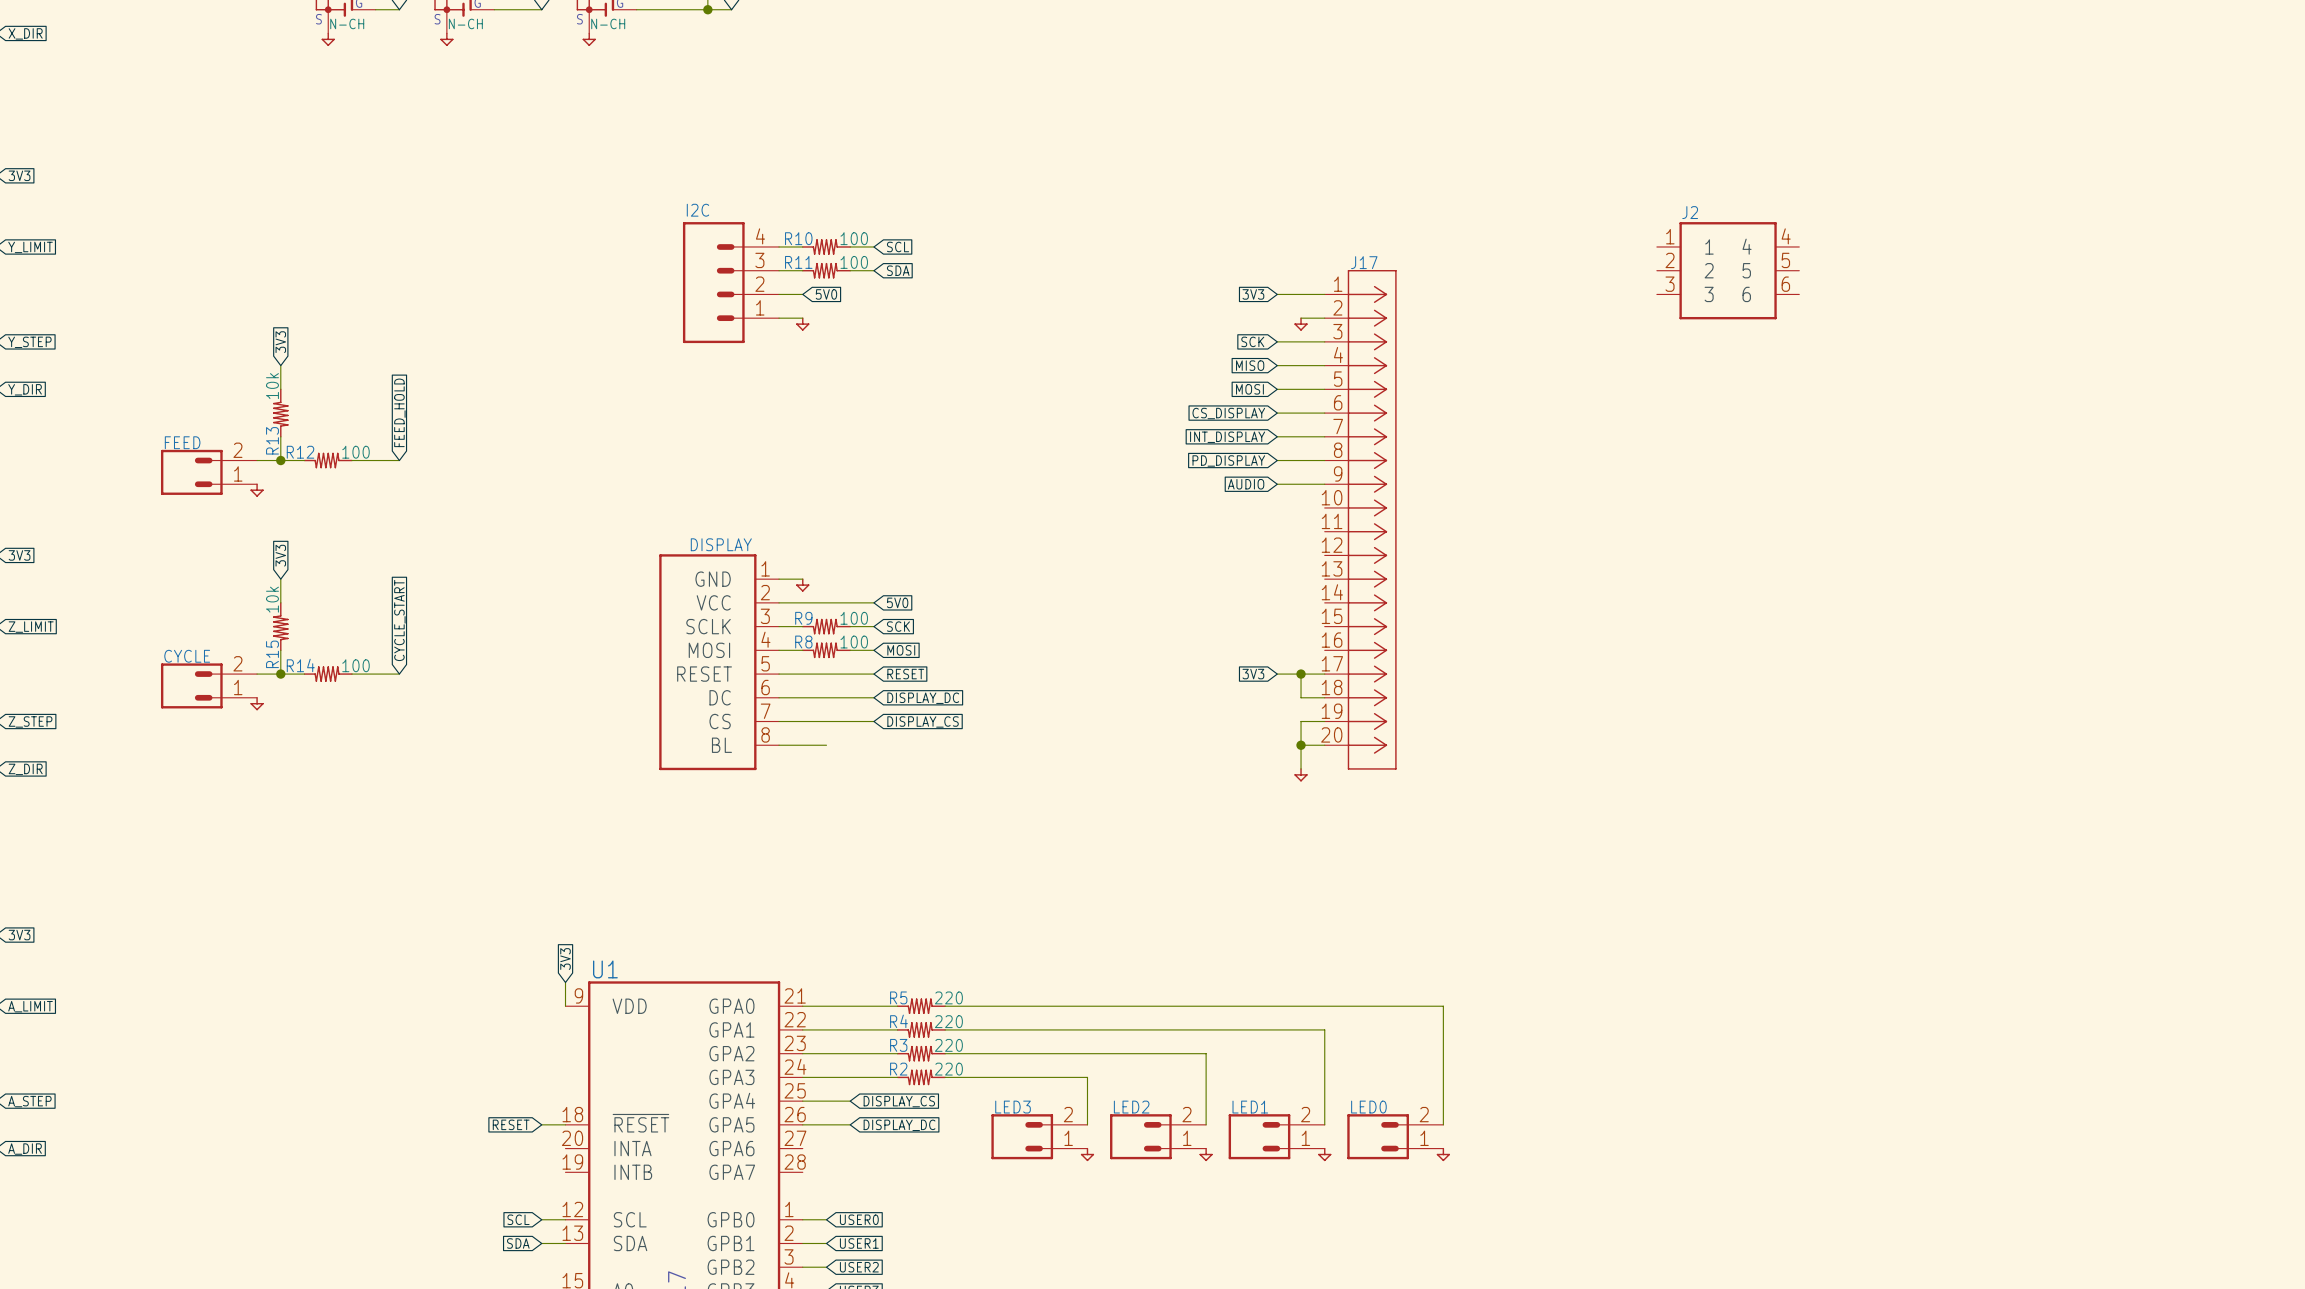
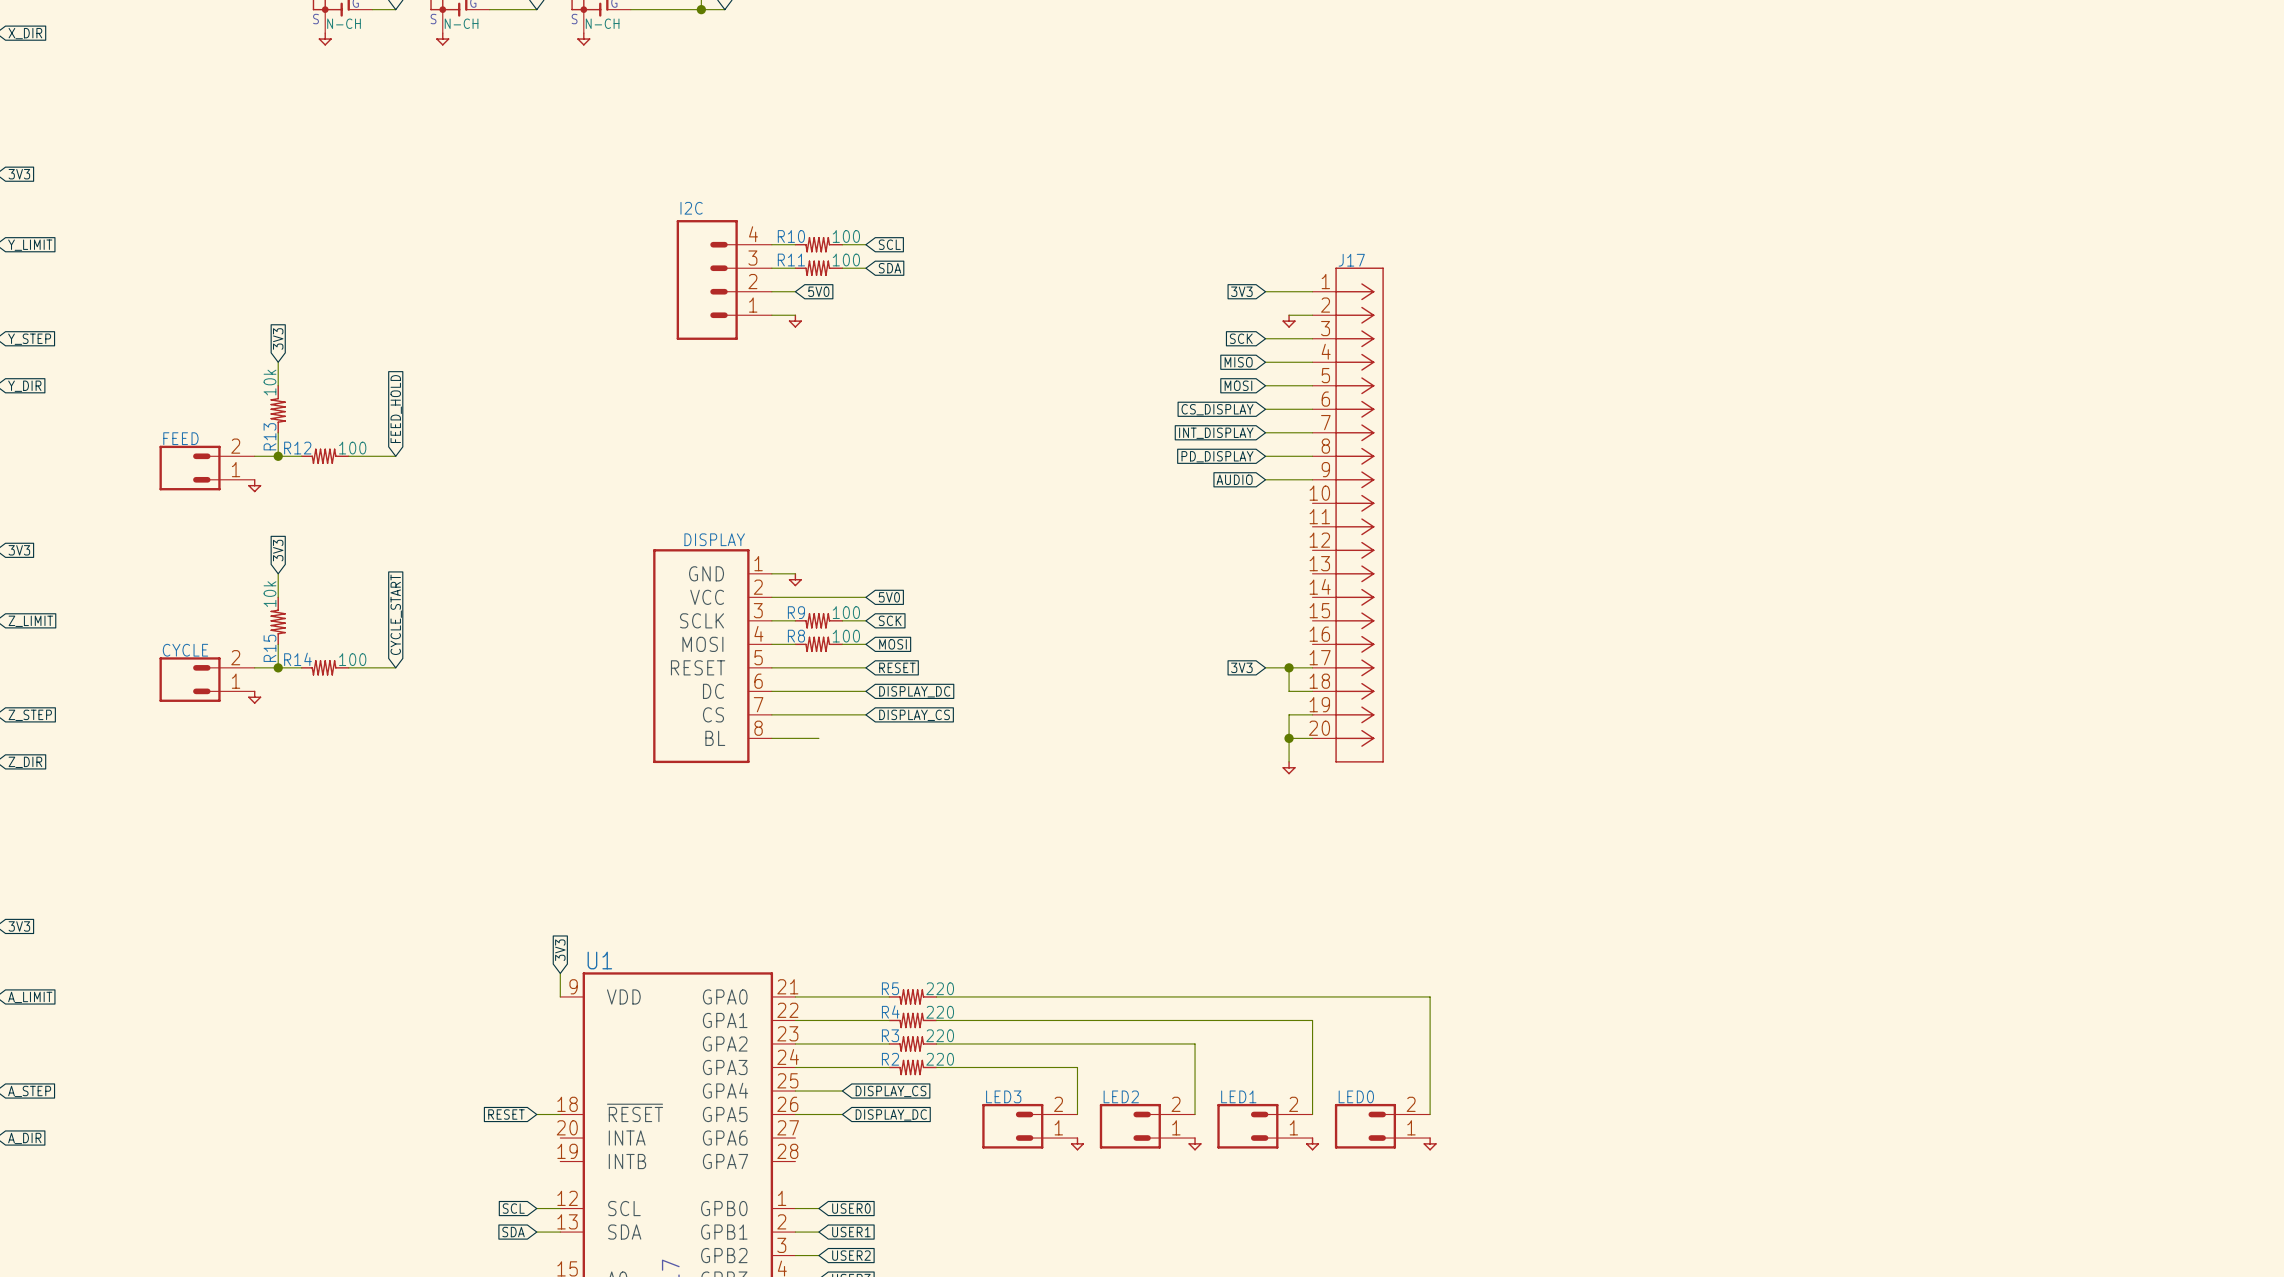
J2: (1728, 270) -> none

